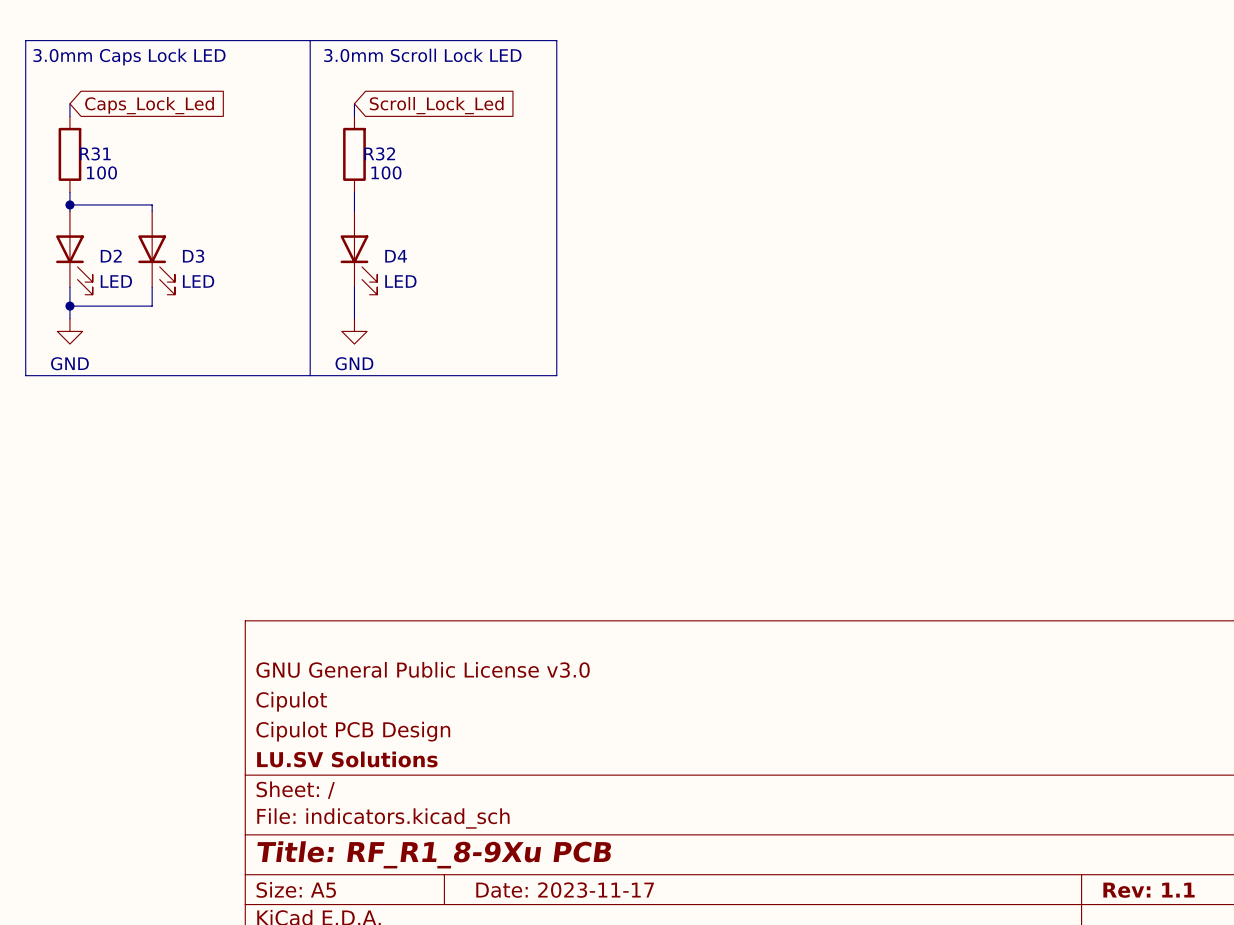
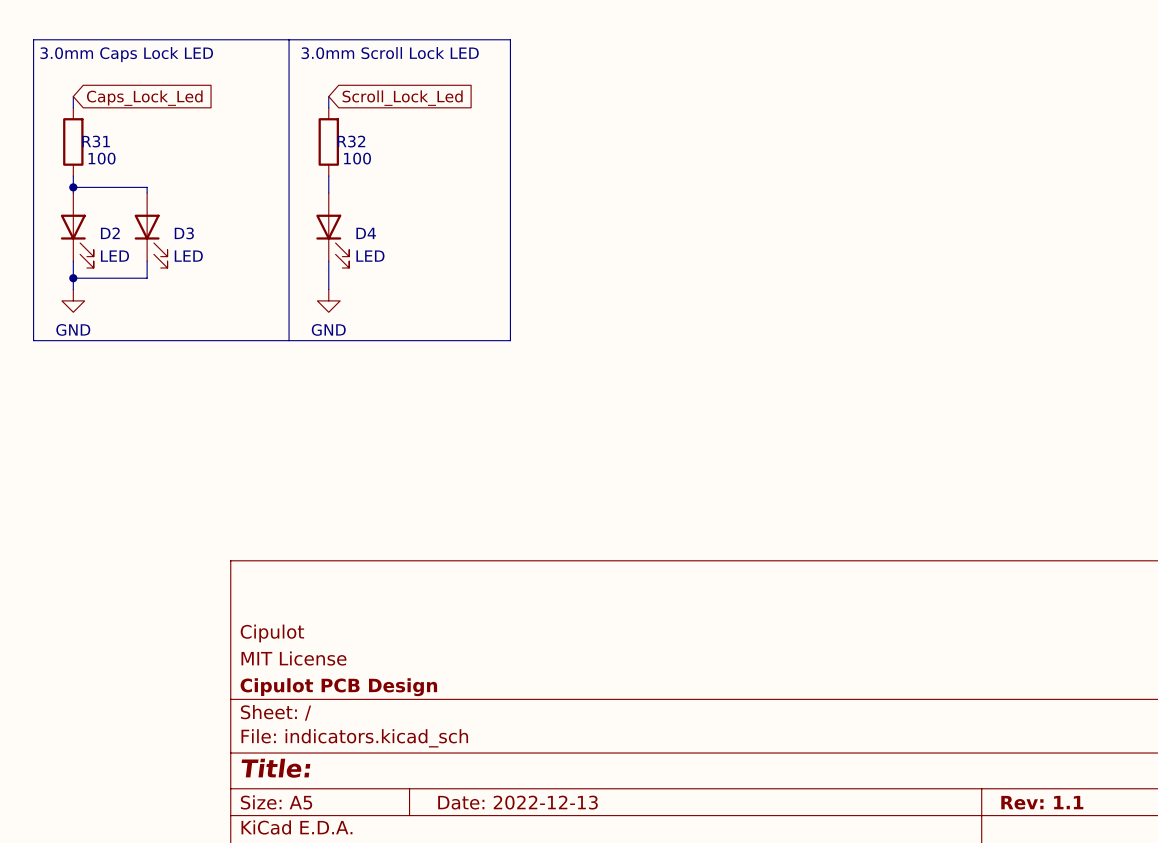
title block: GNU General Public License v3.0 (423, 669) -> none
title block: Cipulot PCB Design (353, 731) -> MIT License (293, 658)
title block: LU.SV Solutions (347, 759) -> Cipulot PCB Design (338, 687)
title block: Title: RF_R1_8-9Xu PCB (434, 854) -> Title: (275, 768)
title block: Date: 2023-11-17 (565, 890) -> Date: 2022-12-13 (517, 802)

